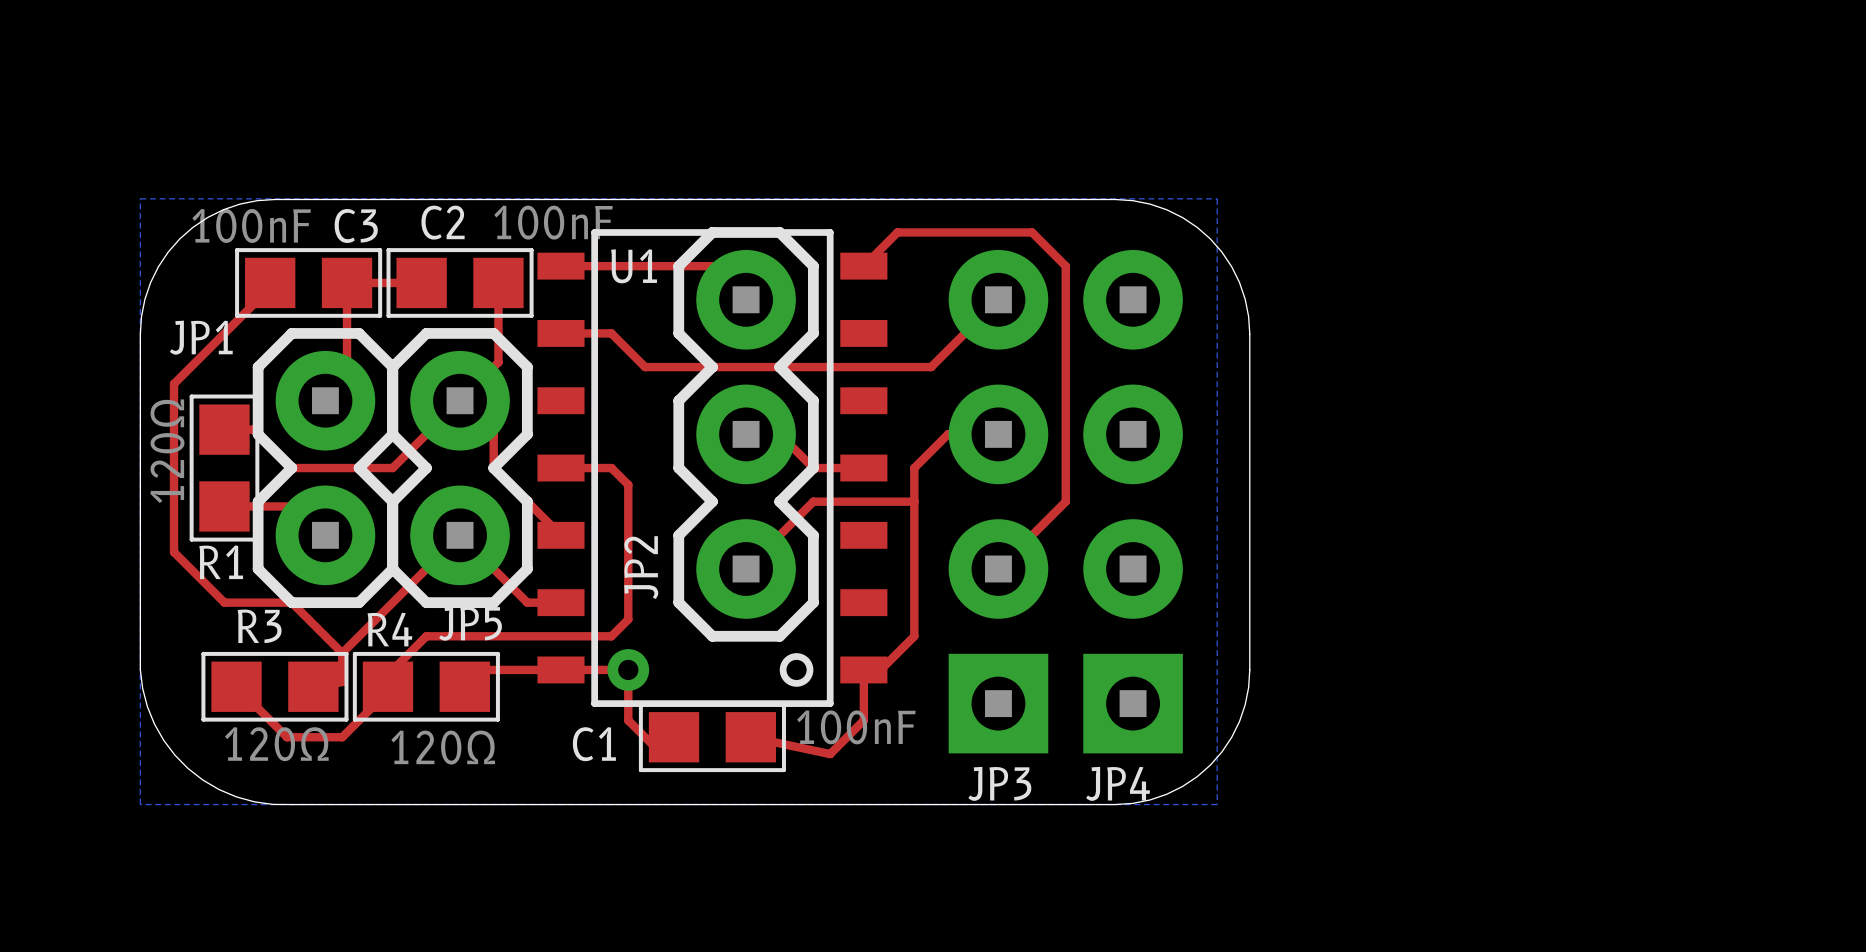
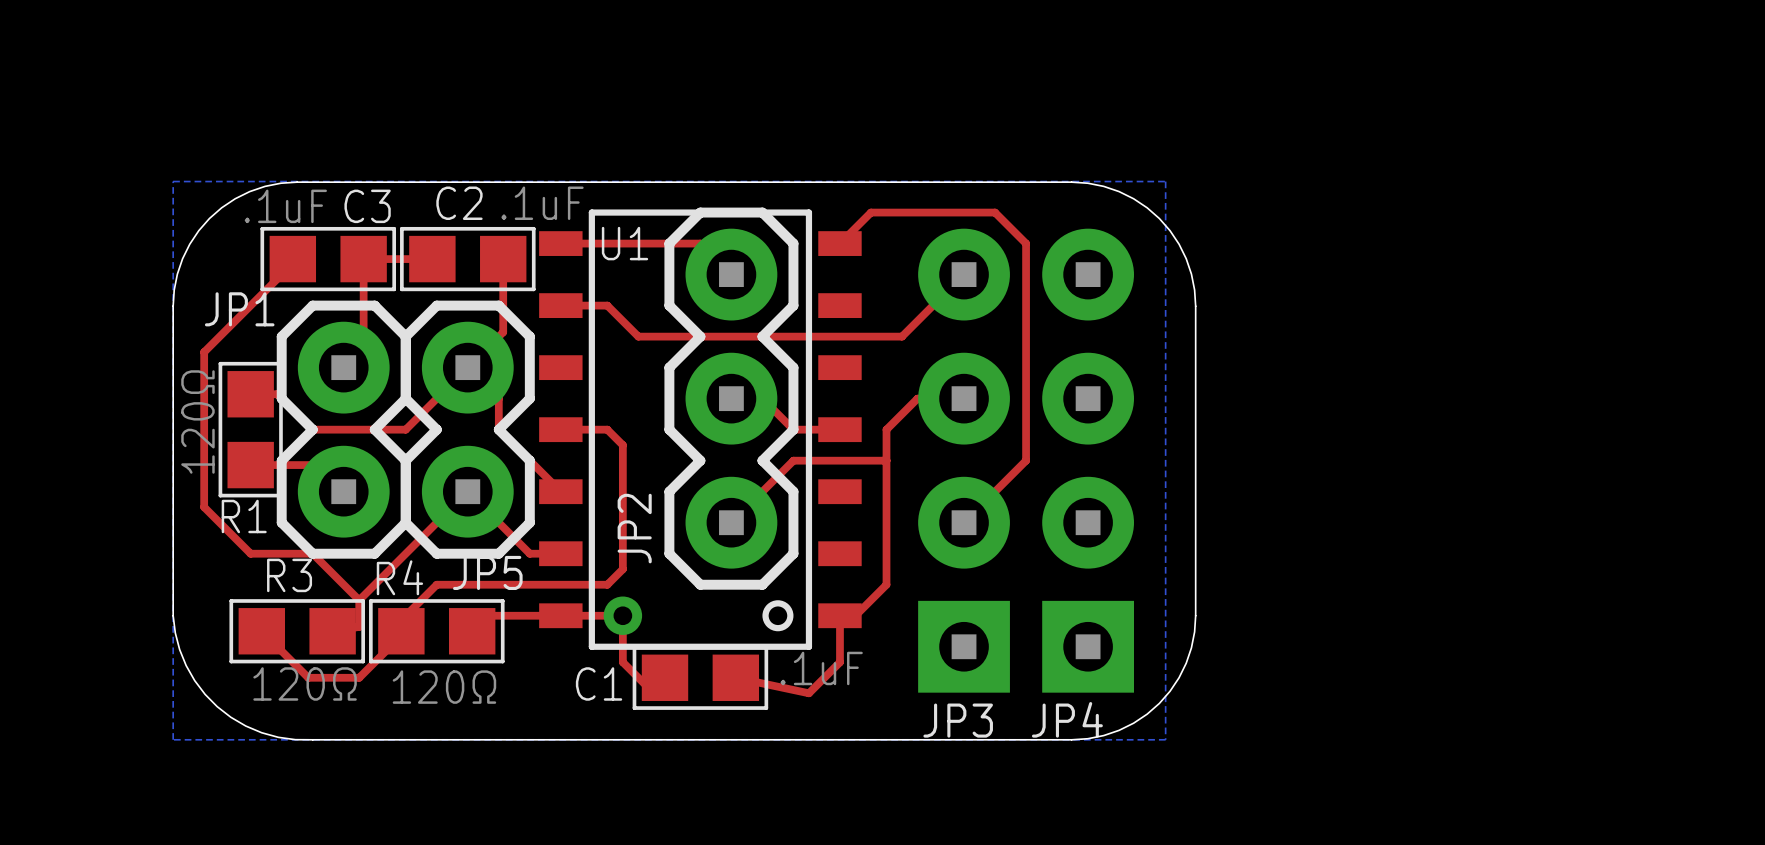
C2 value: 100nF (553, 222) -> .1uF (542, 203)
C3 value: 100nF (251, 225) -> .1uF (285, 206)
C1 value: 100nF (856, 727) -> .1uF (821, 668)

